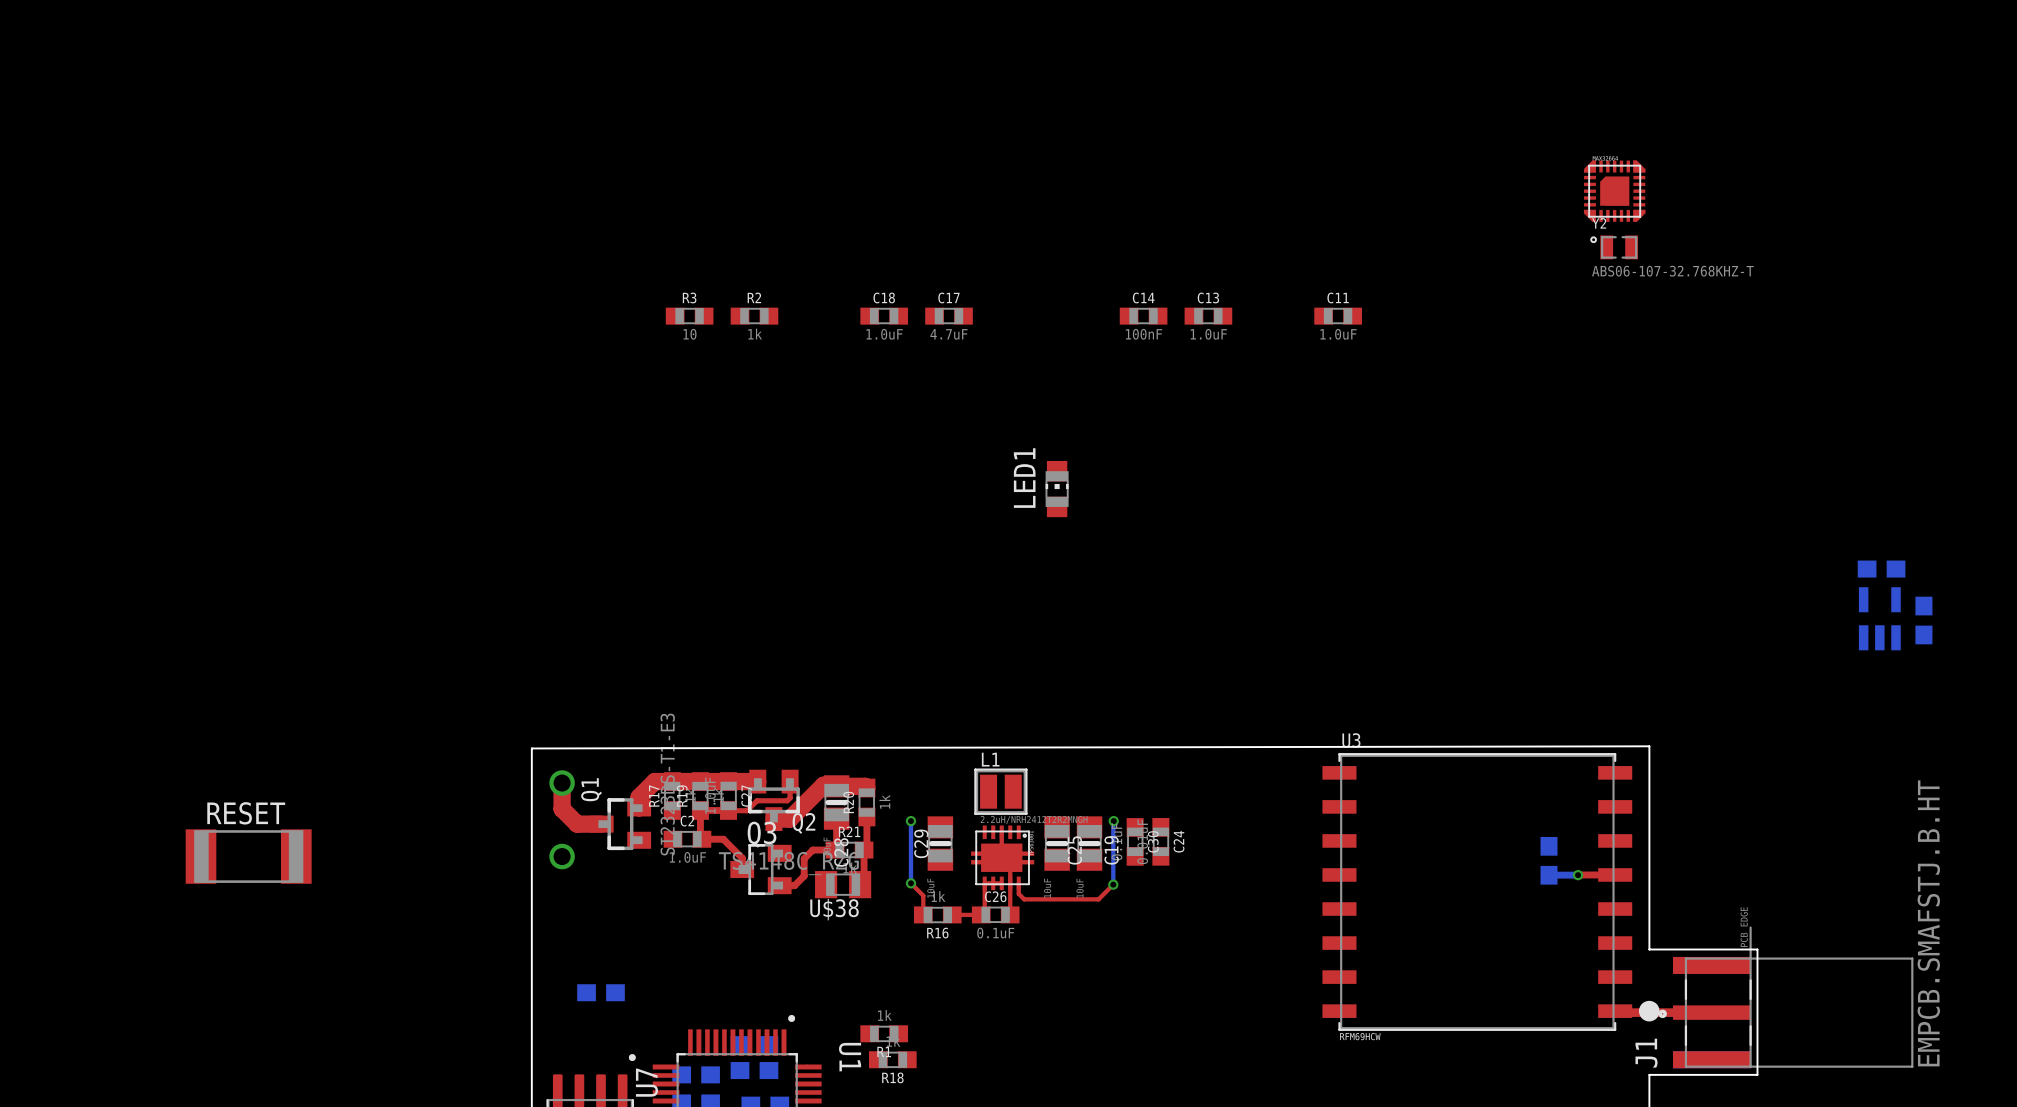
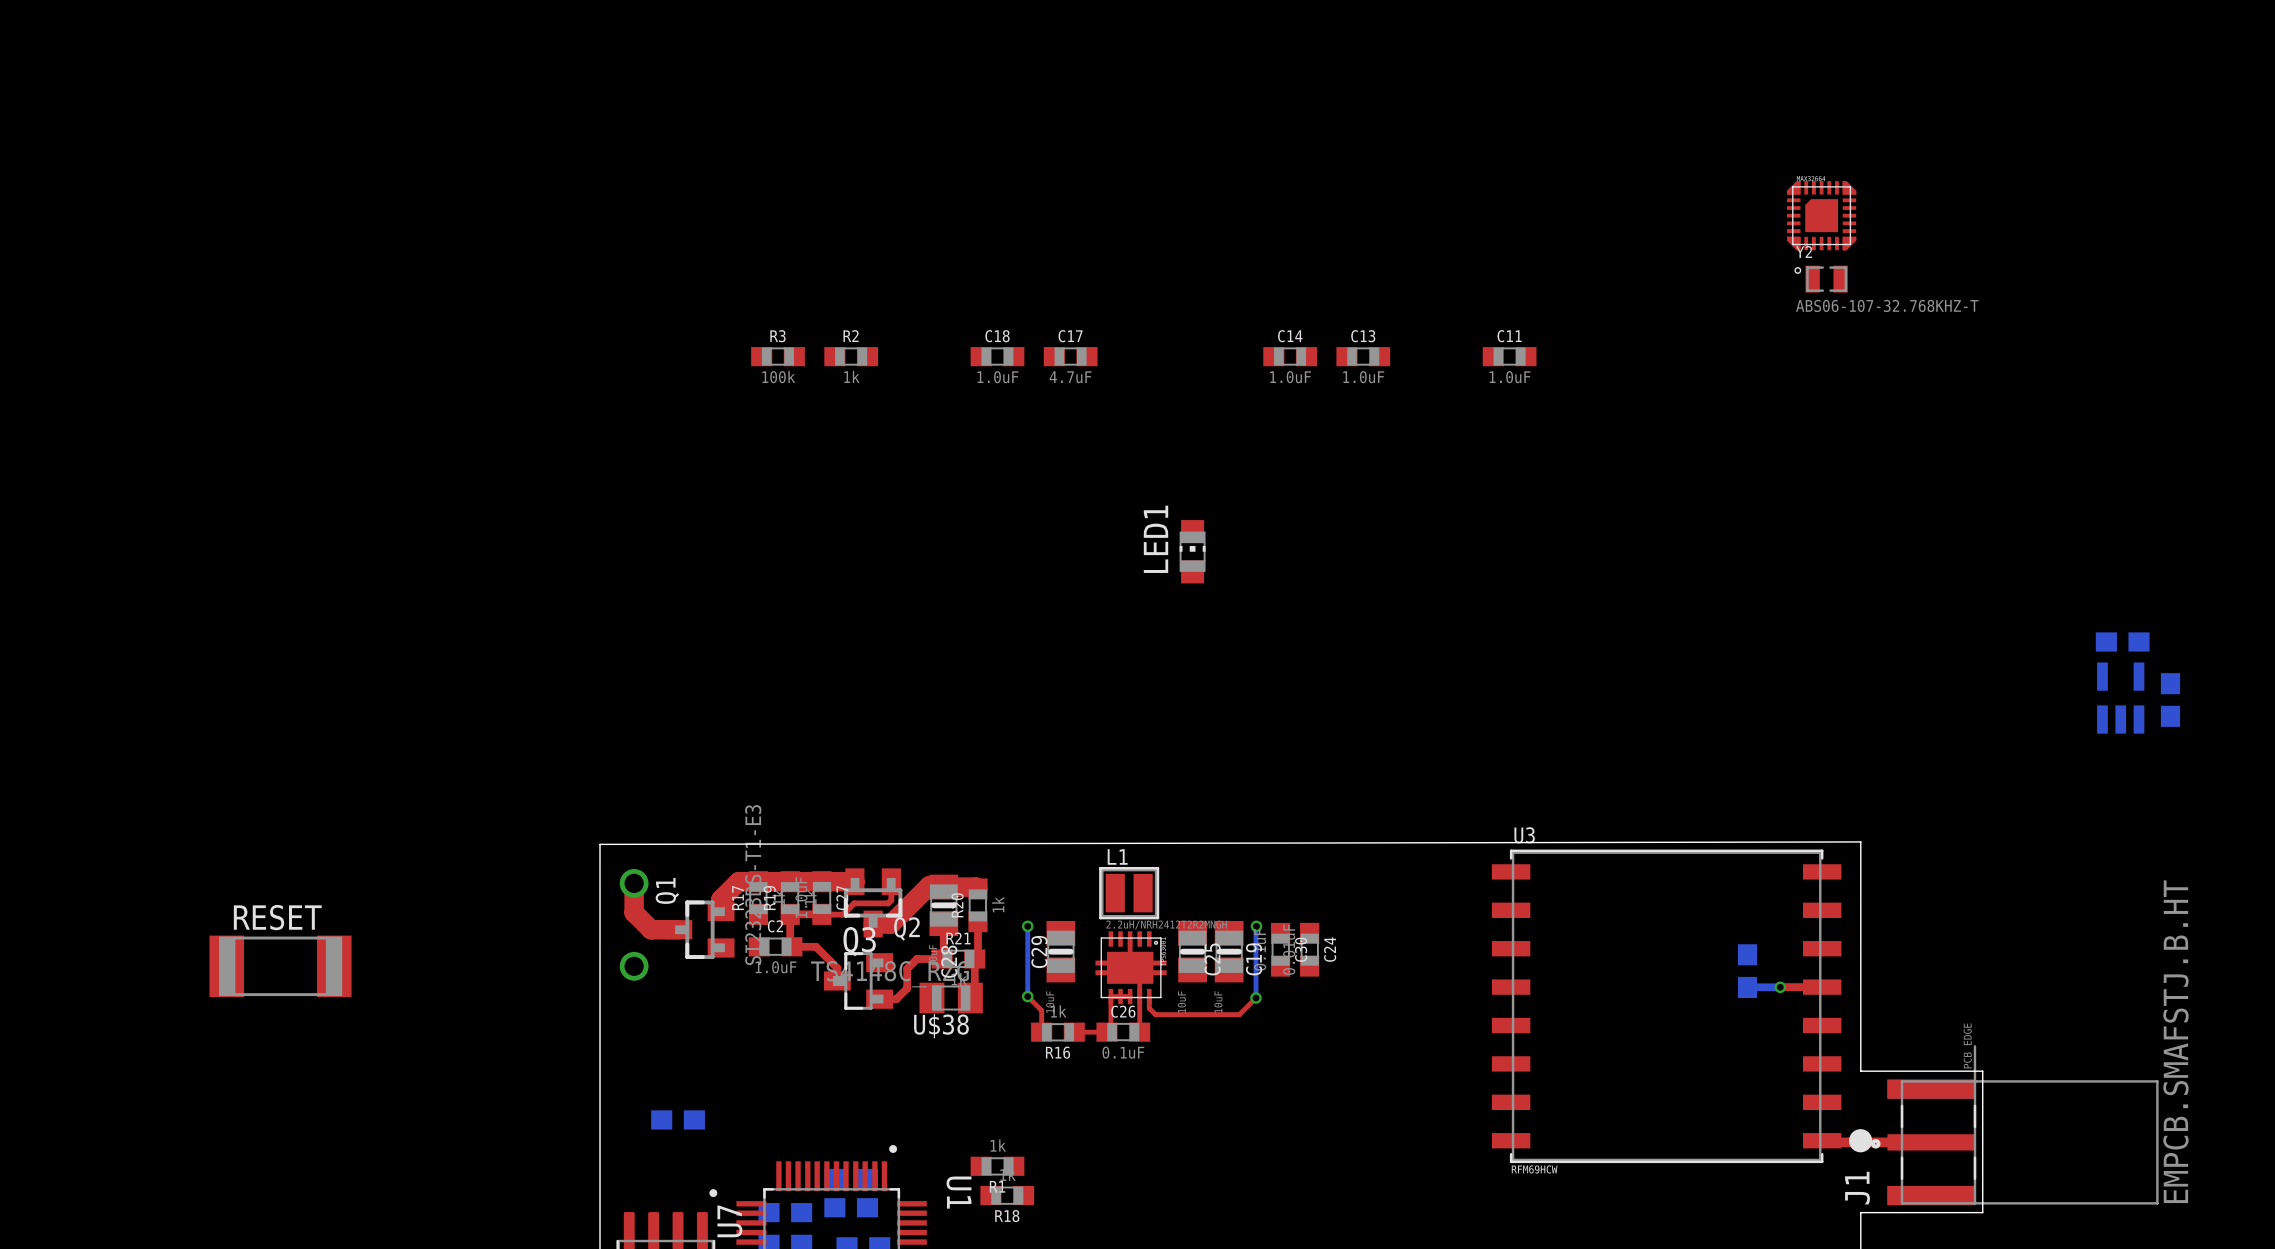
R3 value: 10 (689, 334) -> 100k (778, 377)
C14 value: 100nF (1143, 334) -> 1.0uF (1290, 377)

